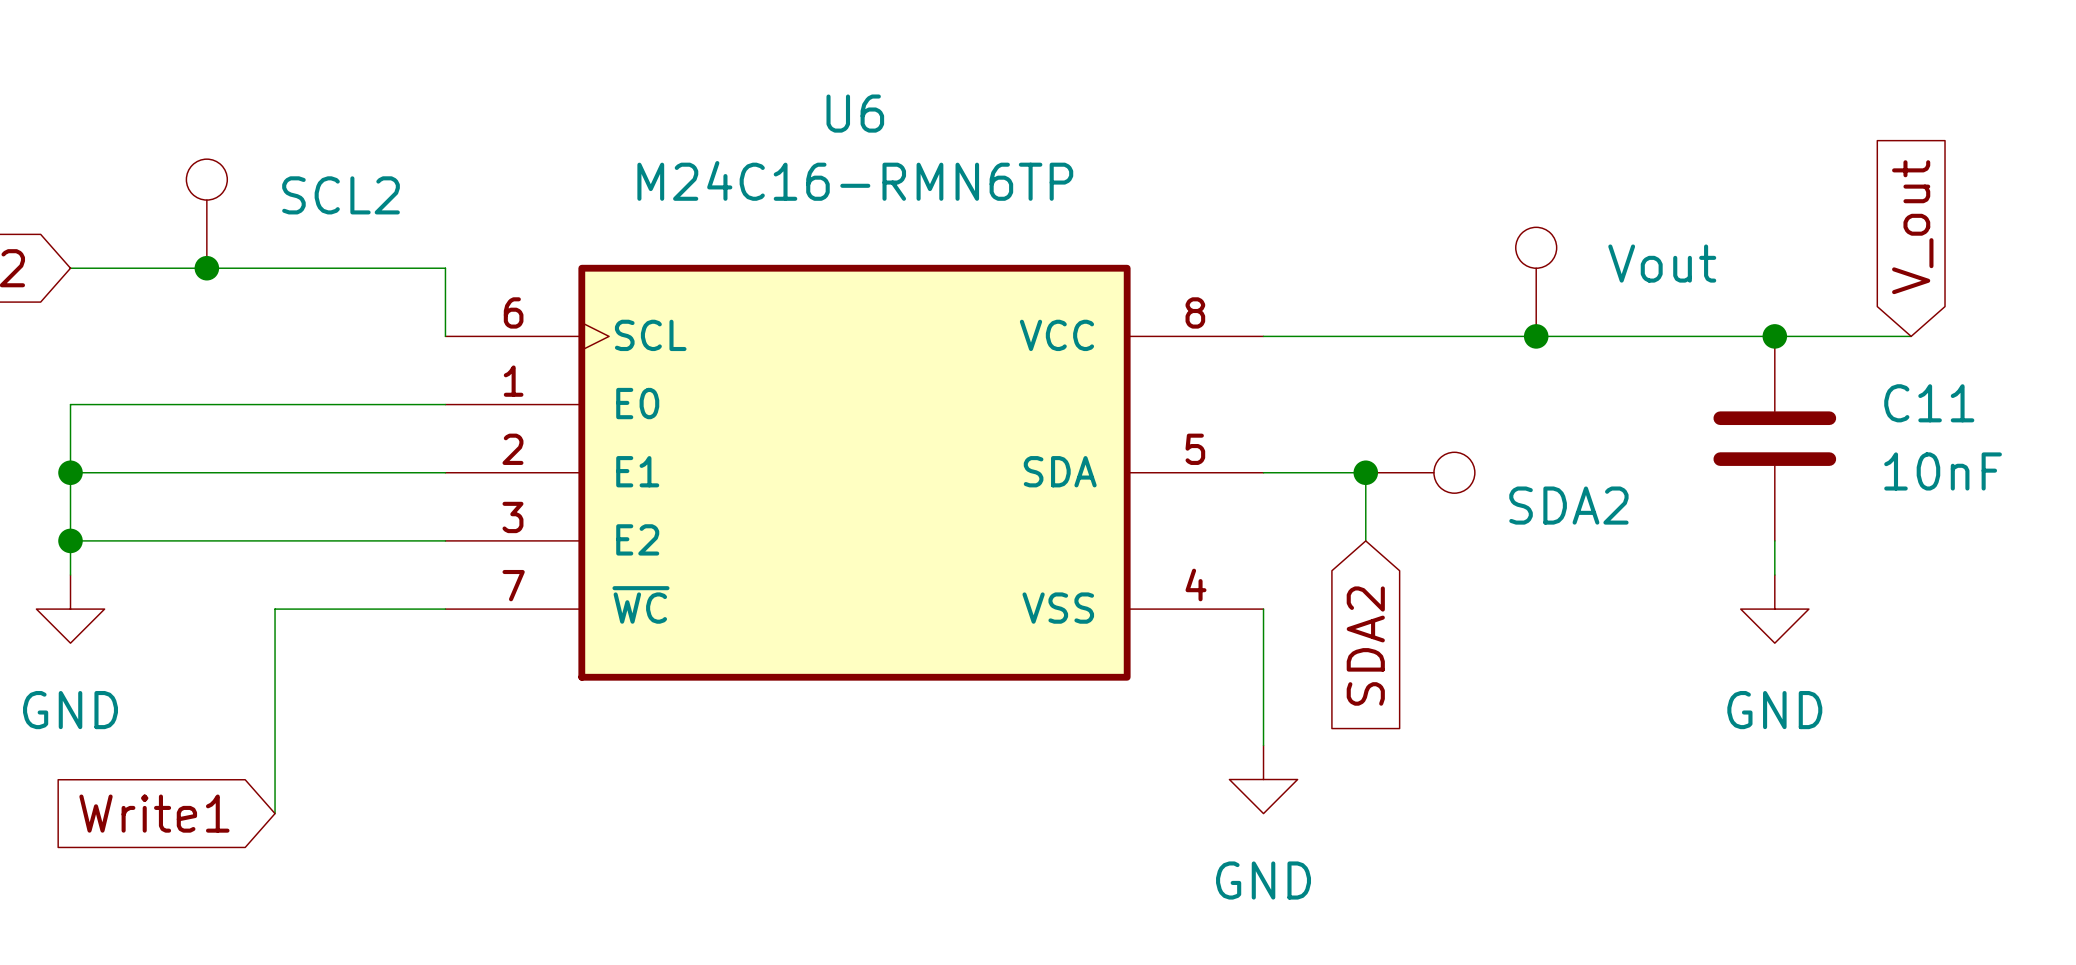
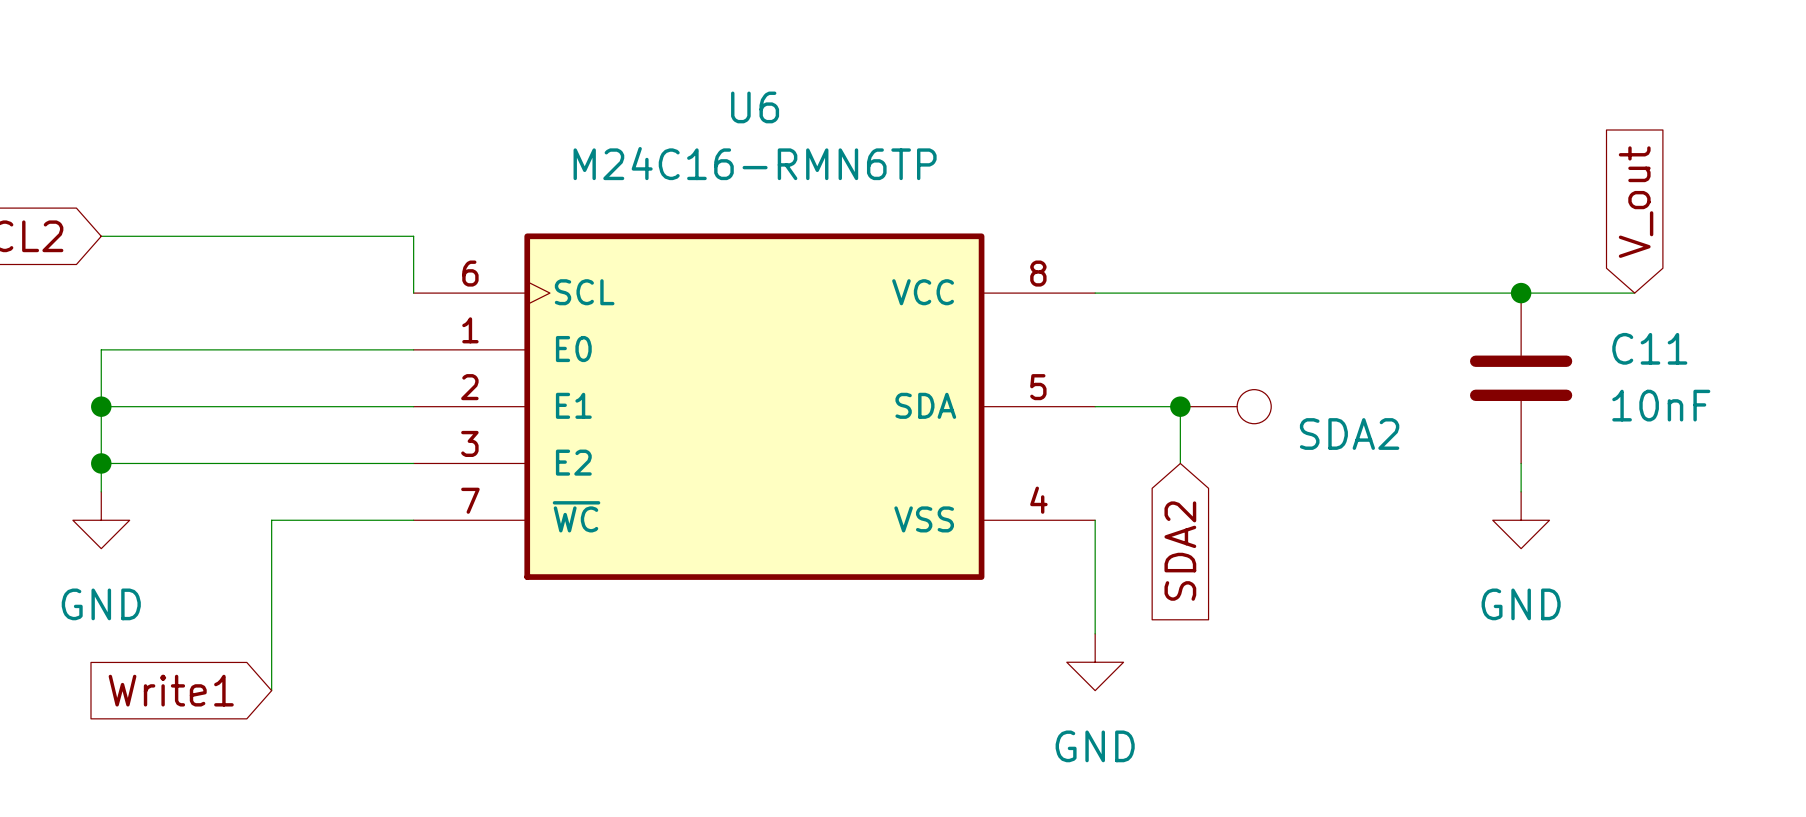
part: SCL2 (206, 213) -> none
junction: (206, 268) -> none
part: Vout (1536, 281) -> none
junction: (1536, 336) -> none

